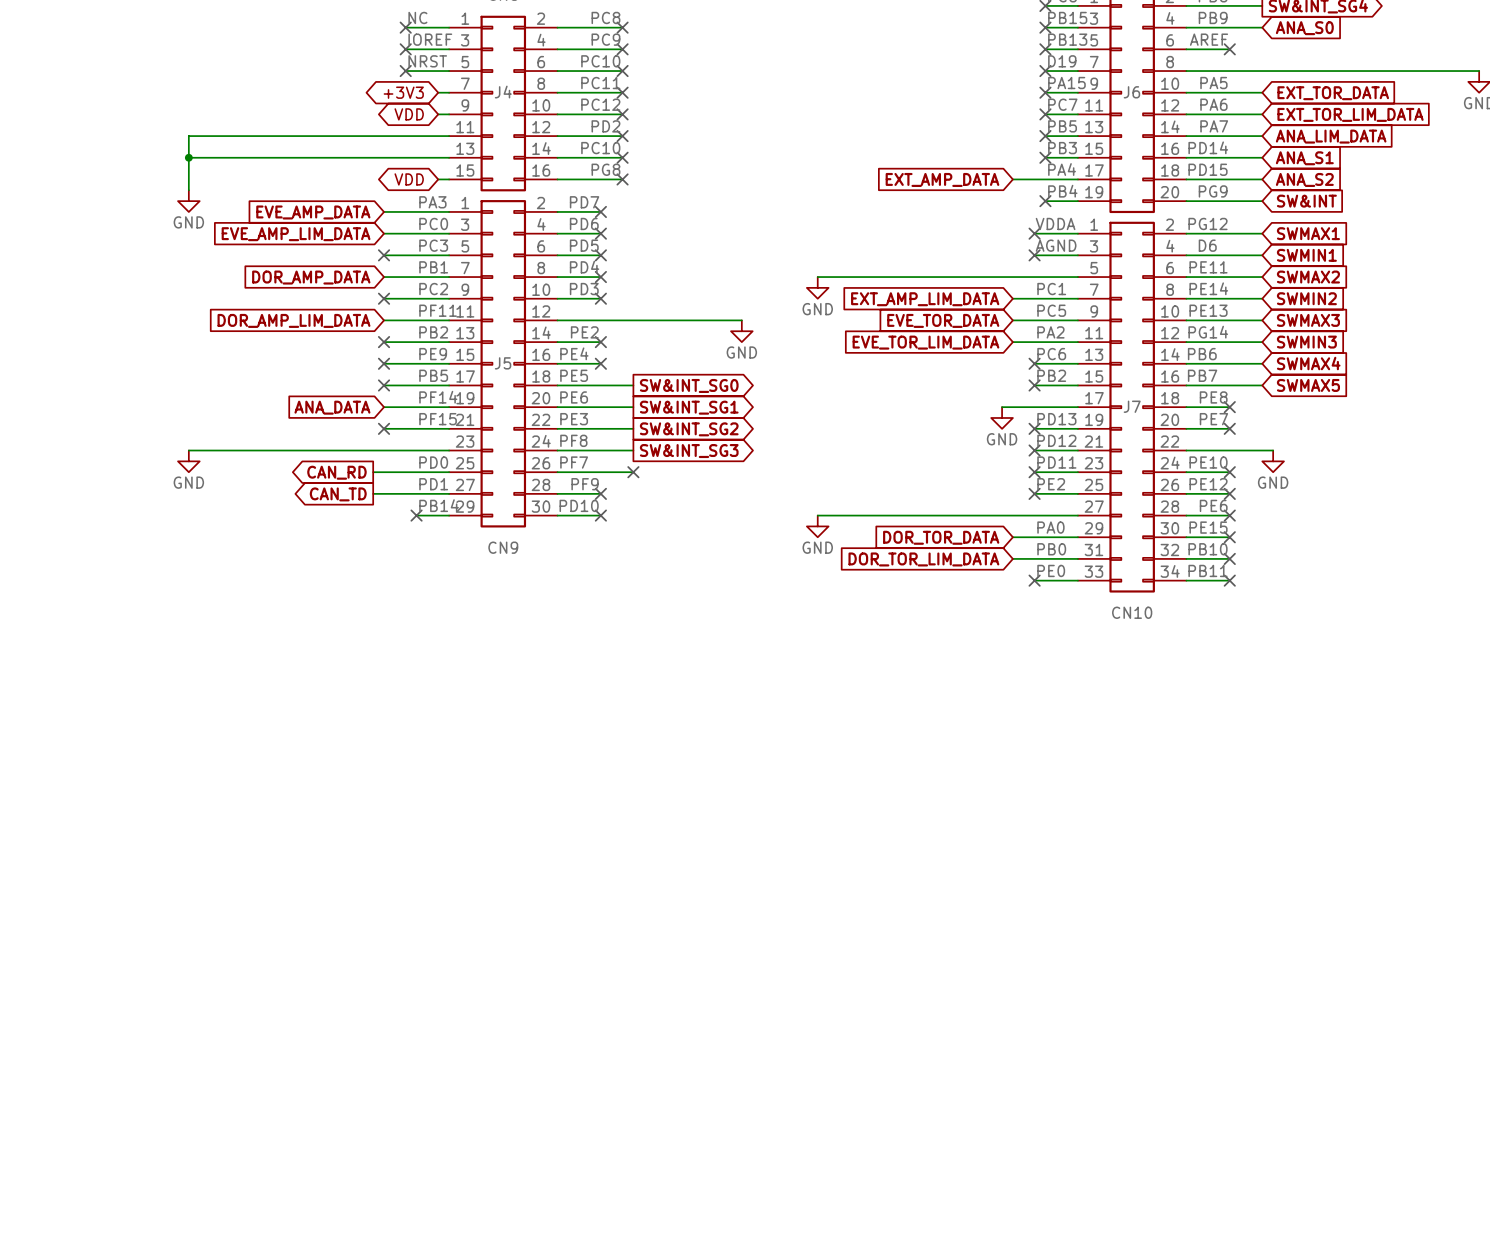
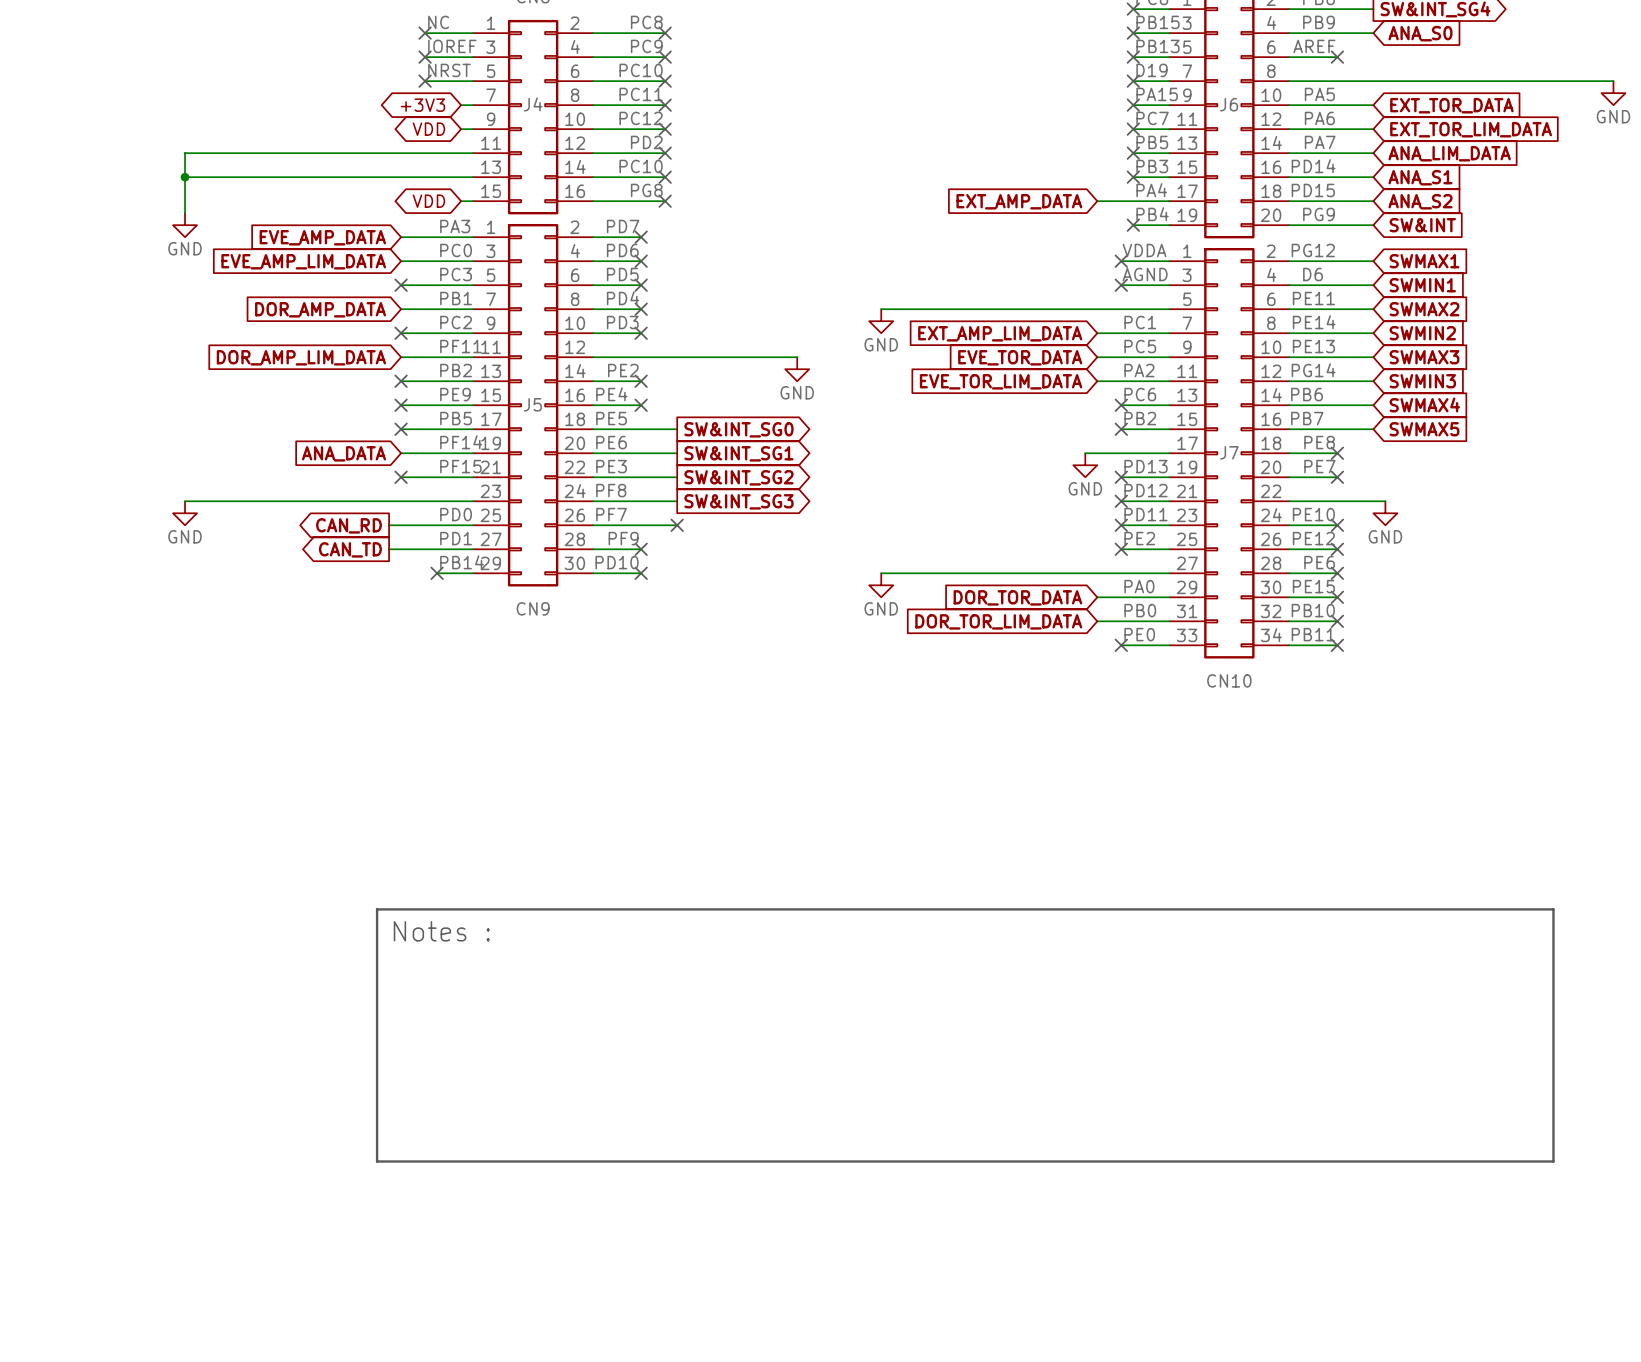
line: none -> (377, 909) (377, 1161) (1553, 1161) (1553, 909) (377, 909)
text: none -> Notes : (441, 931)

